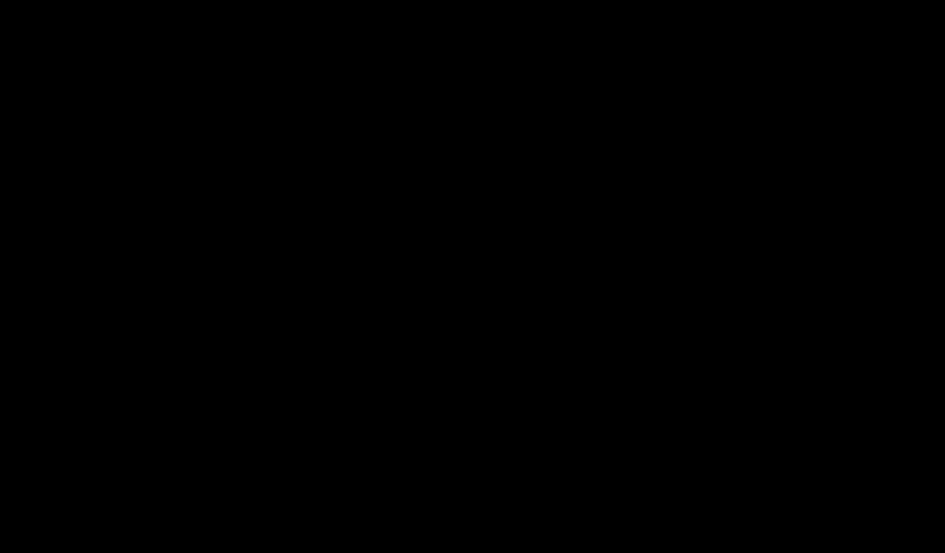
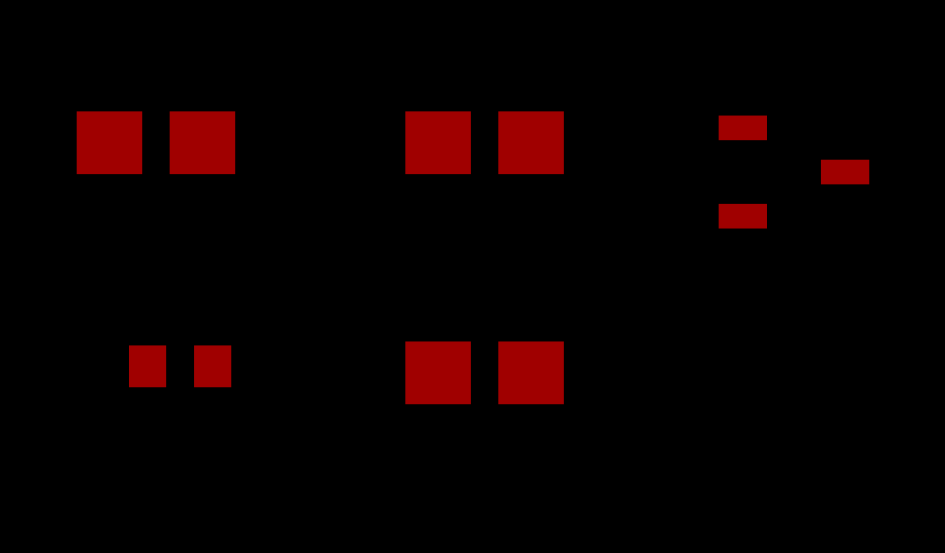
part: none -> (155, 142)
part: none -> (484, 142)
part: none -> (793, 172)
part: none -> (180, 366)
part: none -> (484, 372)

